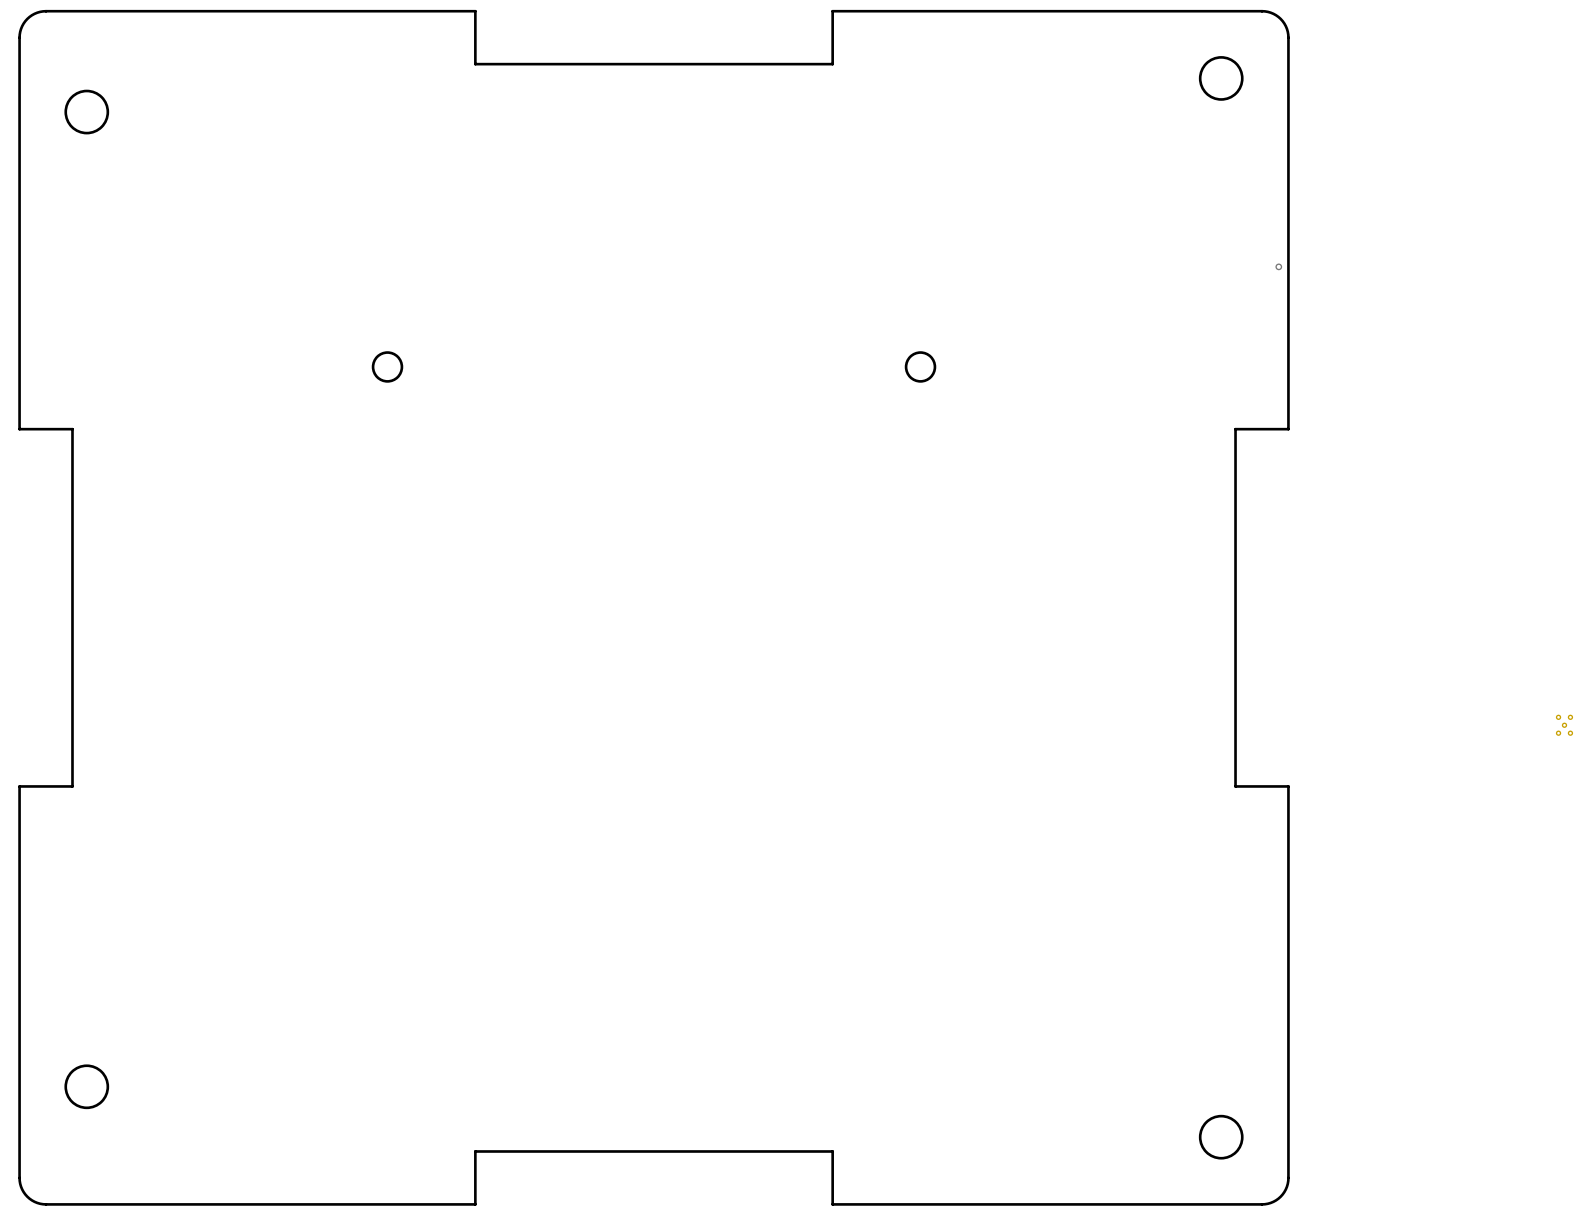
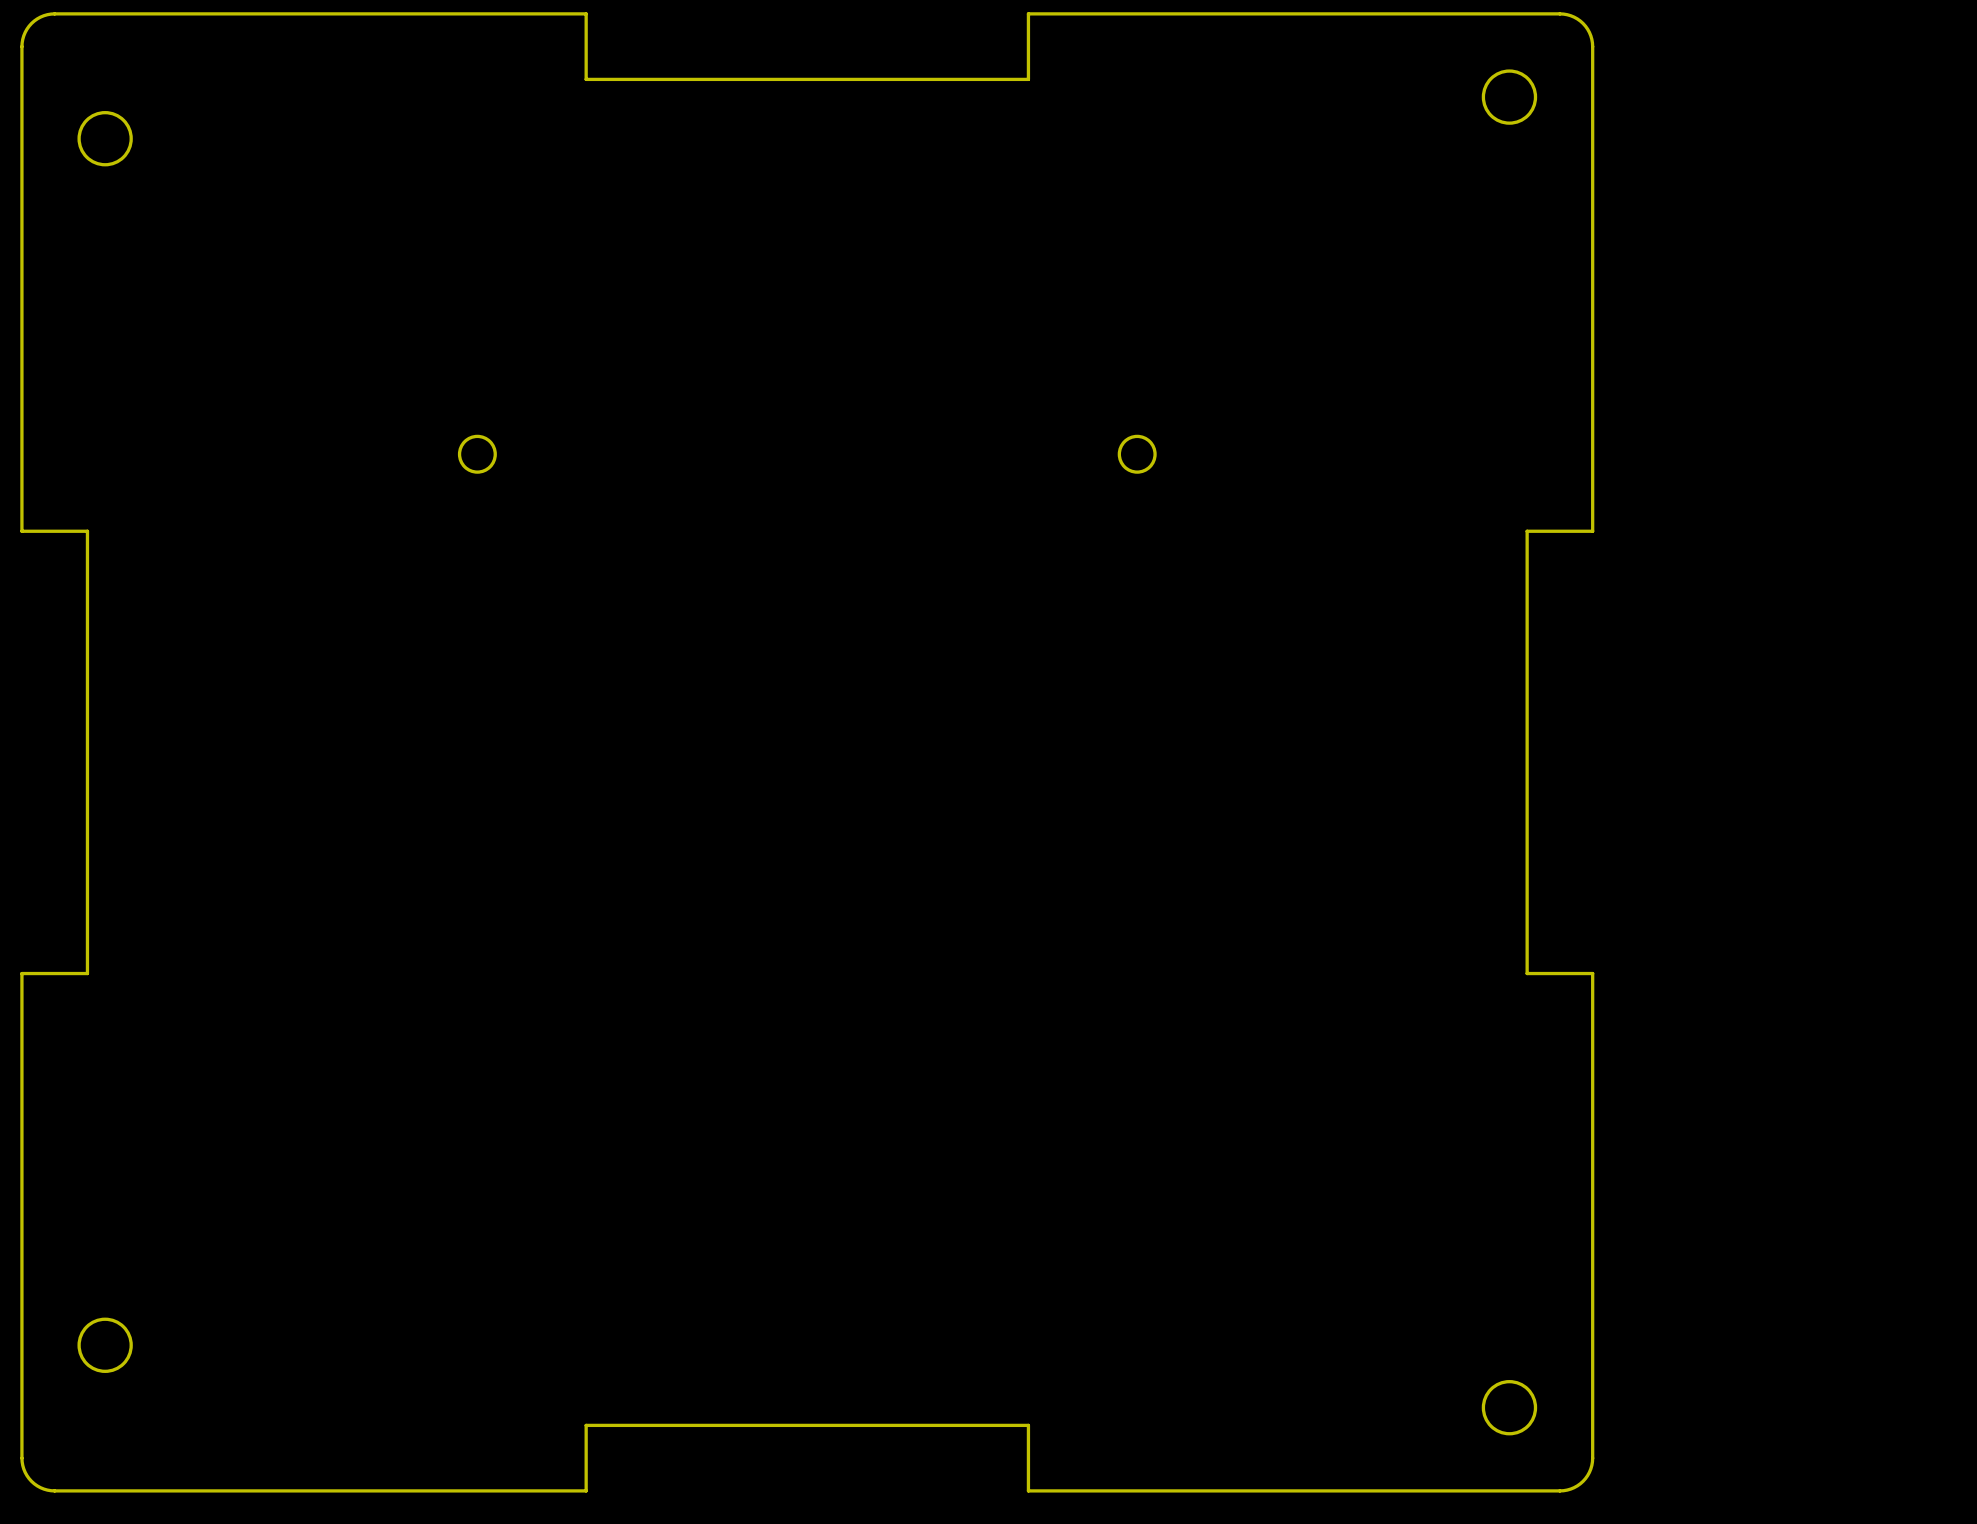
via: (1278, 266) -> none
part: (1564, 725) -> none

